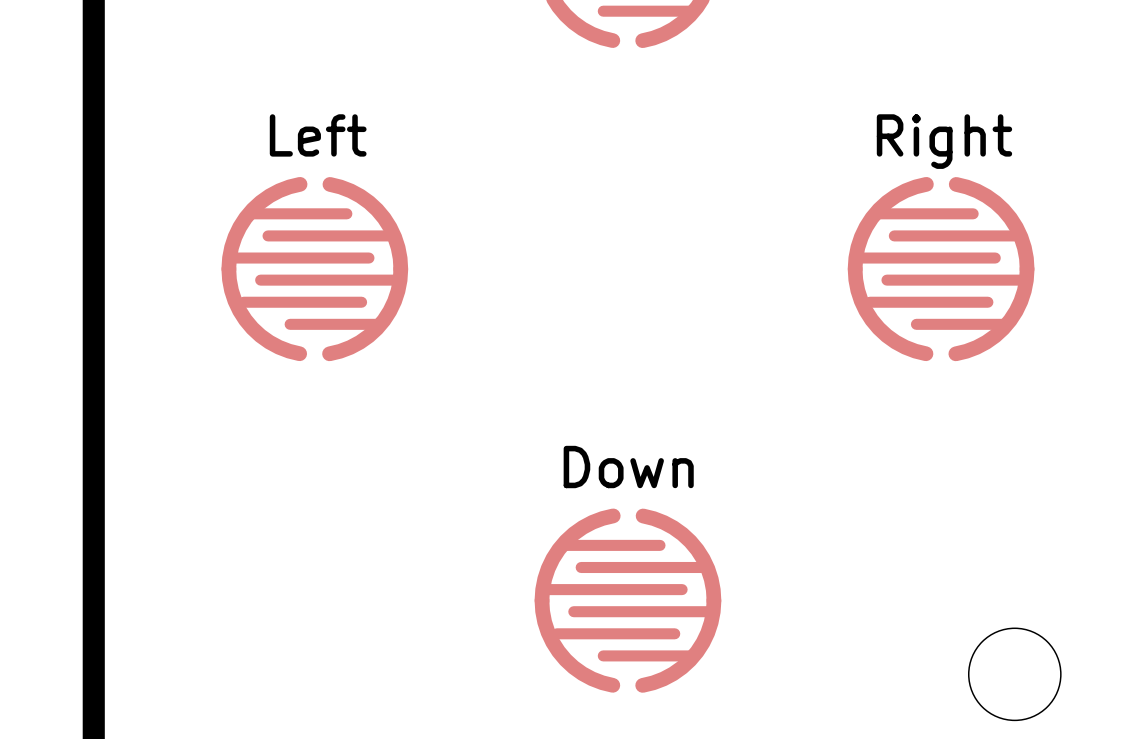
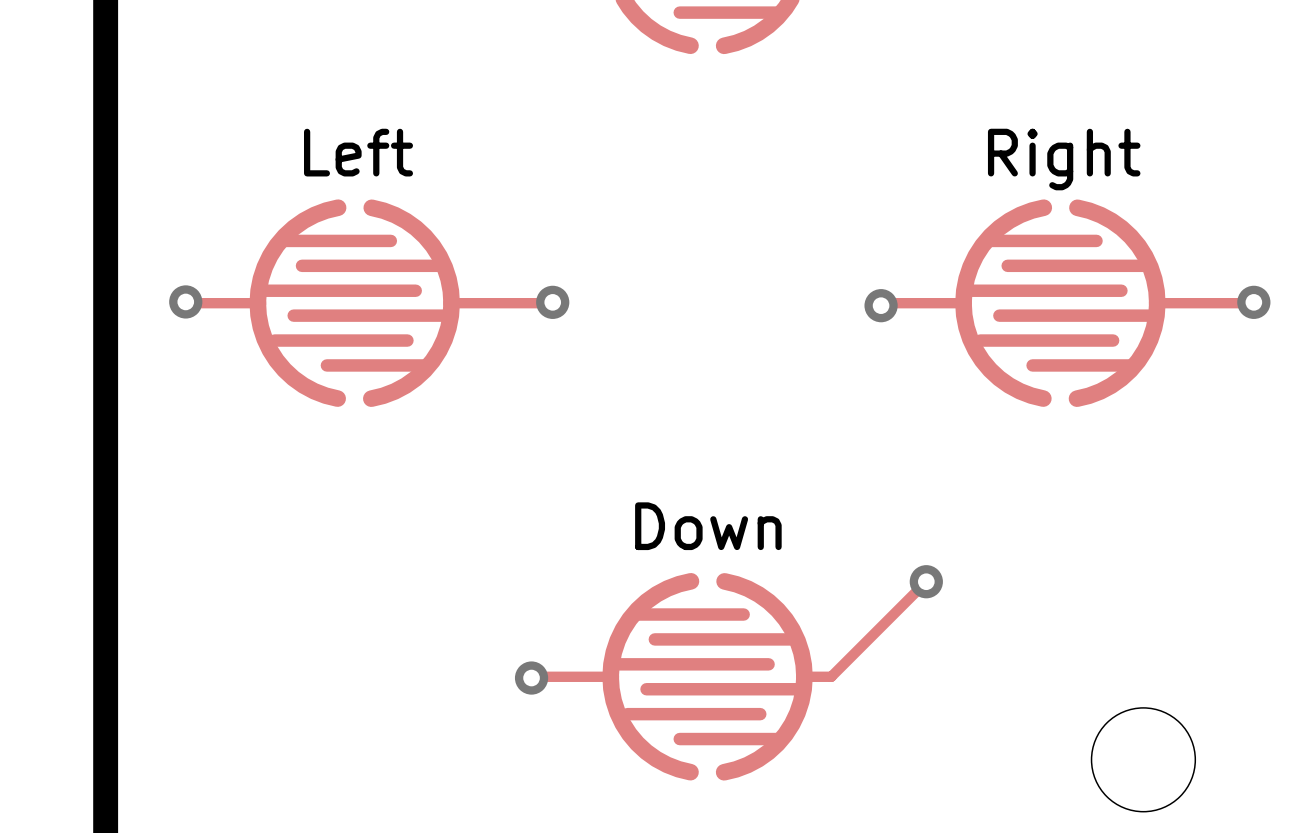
track: none -> (185, 301) (257, 303)
via: none -> (185, 301)
track: none -> (552, 302) (451, 303)
via: none -> (552, 302)
track: none -> (1253, 302) (1157, 303)
via: none -> (1253, 302)
track: none -> (963, 303) (883, 303) (881, 305)
via: none -> (881, 305)
track: none -> (926, 581) (831, 676) (804, 676)
via: none -> (926, 581)
track: none -> (610, 676) (531, 678)
via: none -> (531, 678)

